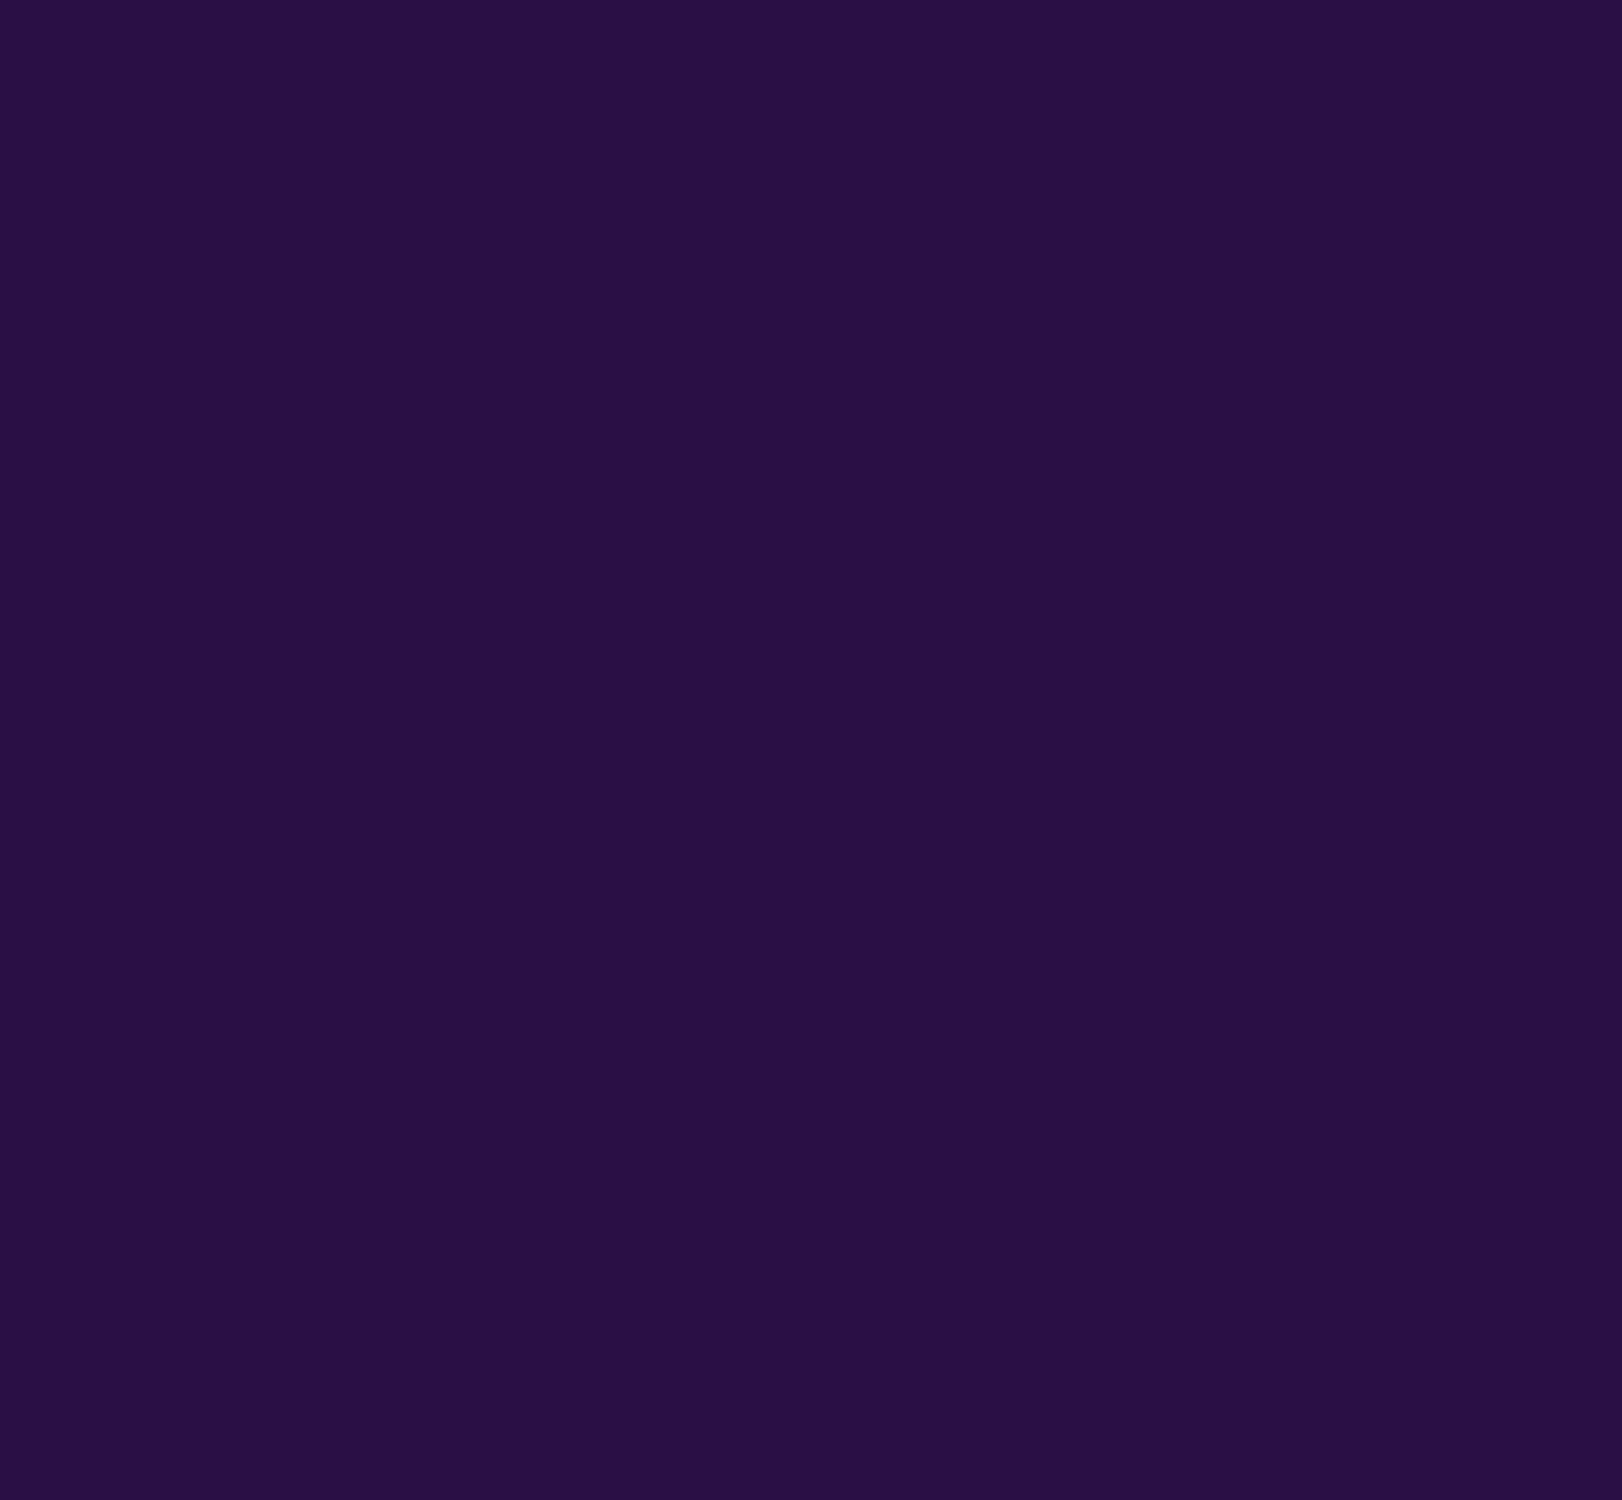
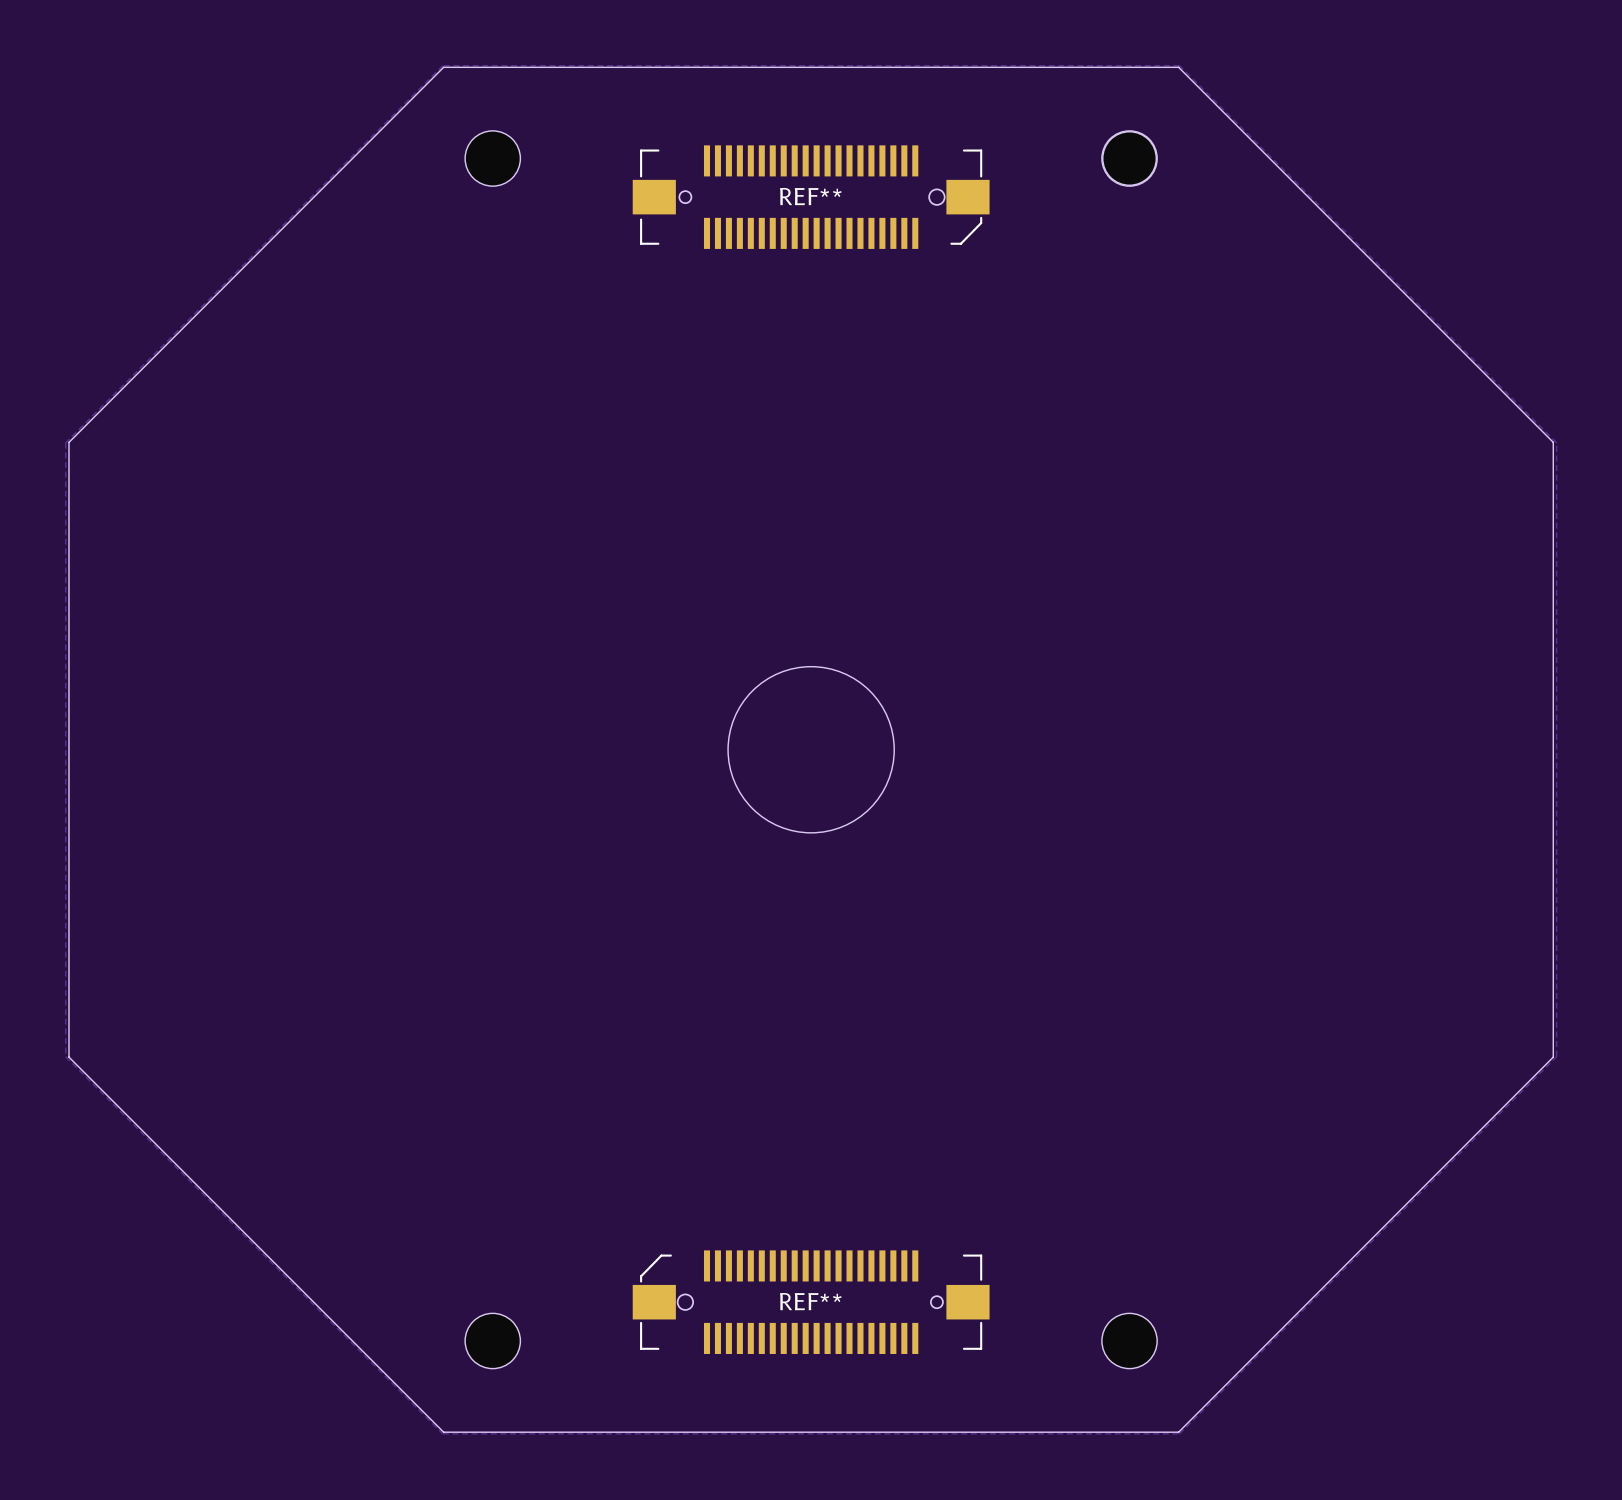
zone outline: none -> (1179, 65) (1556, 442) (1556, 1056) (1179, 1433) (442, 1433) (65, 1056) (65, 442) (442, 65) (1179, 65)
board edge: none -> (1178, 67) (1553, 442) (1553, 1057) (1178, 1432) (443, 1432) (69, 1057) (69, 442) (443, 67) (1178, 67)
round board edge: none -> [1102, 131, 1157, 186]
part: none -> (492, 158)
part: none -> (1129, 158)
REF**: none -> (811, 197)
round board edge: none -> [727, 666, 895, 833]
REF**: none -> (811, 1302)
part: none -> (492, 1340)
part: none -> (1129, 1340)

